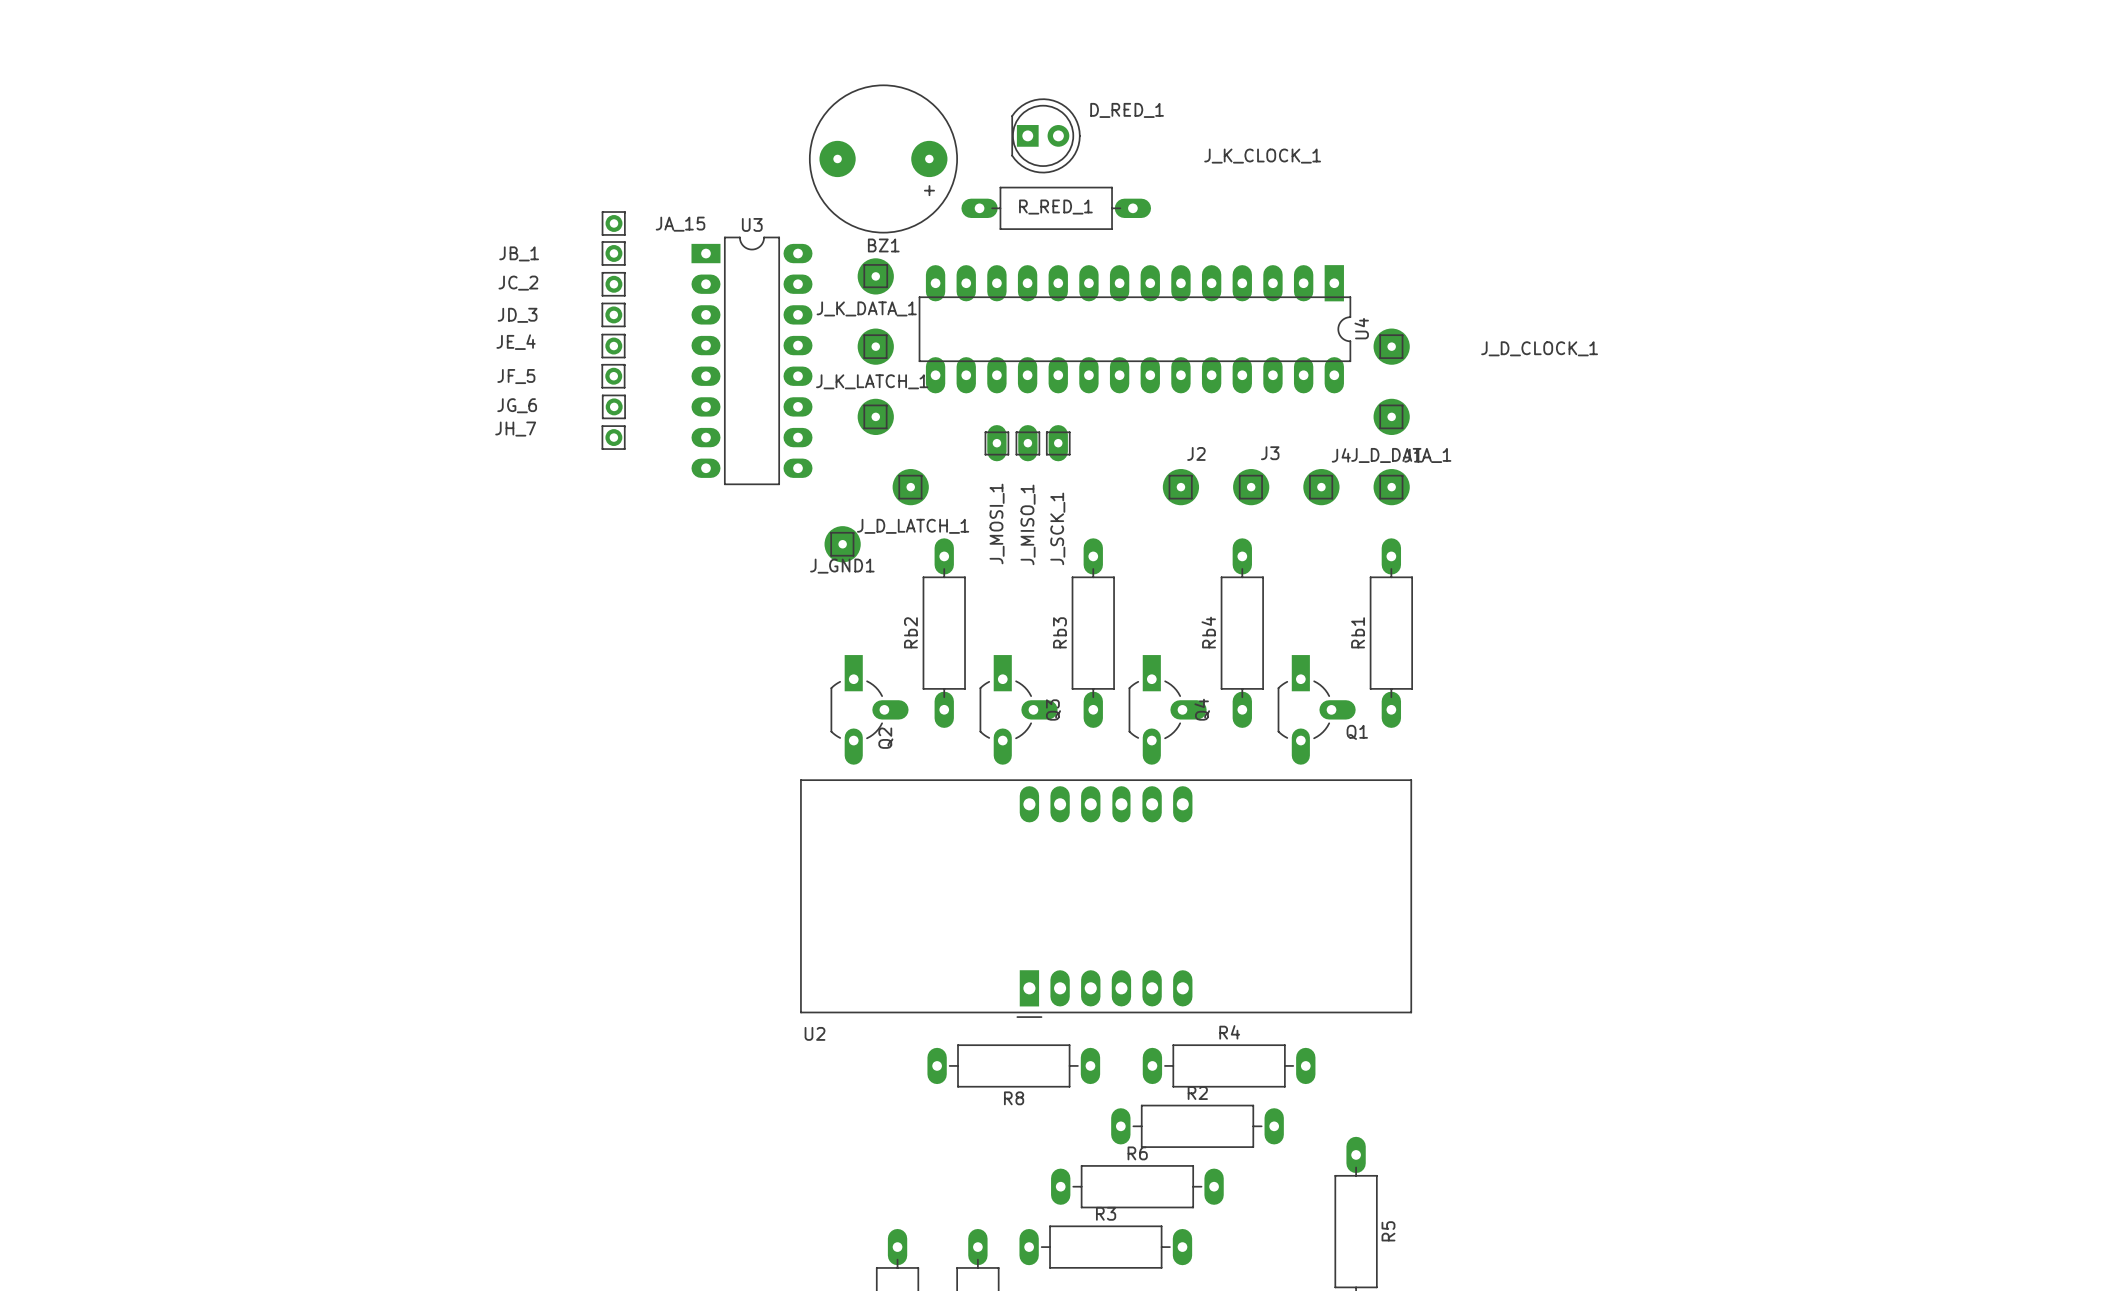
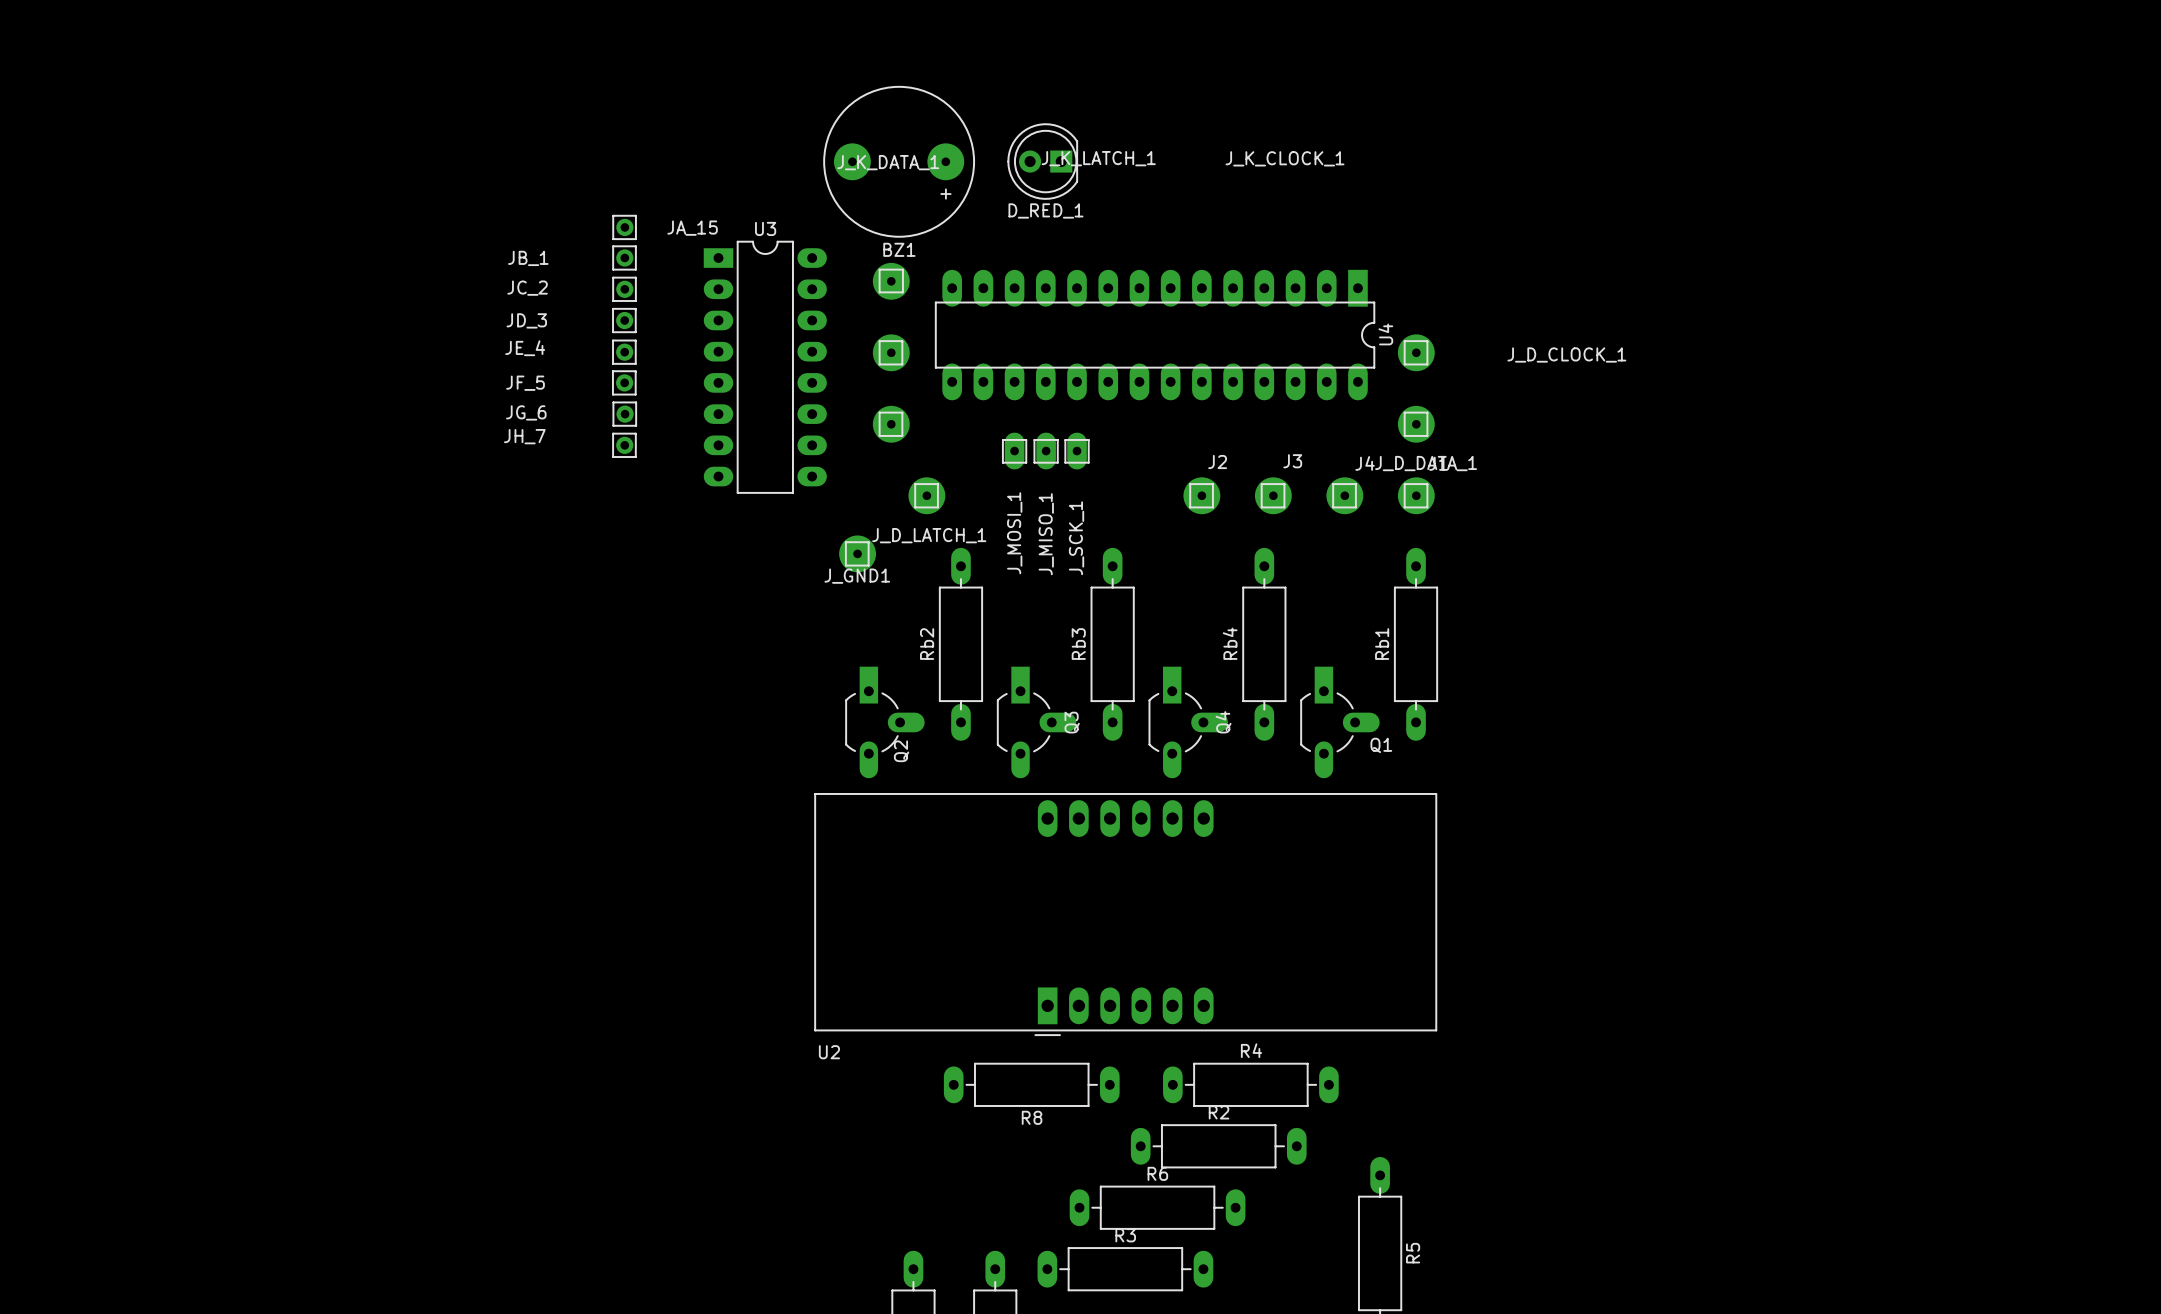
D_RED_1 footprint: [1011, 98, 1081, 174] -> [1007, 123, 1078, 200]
D_RED_1 name position: D_RED_1 (1127, 110) -> D_RED_1 (1045, 210)
R_RED_1: (1056, 208) -> none
J_K_DATA_1 name position: J_K_DATA_1 (866, 308) -> J_K_DATA_1 (888, 162)
J_K_LATCH_1 name position: J_K_LATCH_1 (872, 381) -> J_K_LATCH_1 (1098, 158)

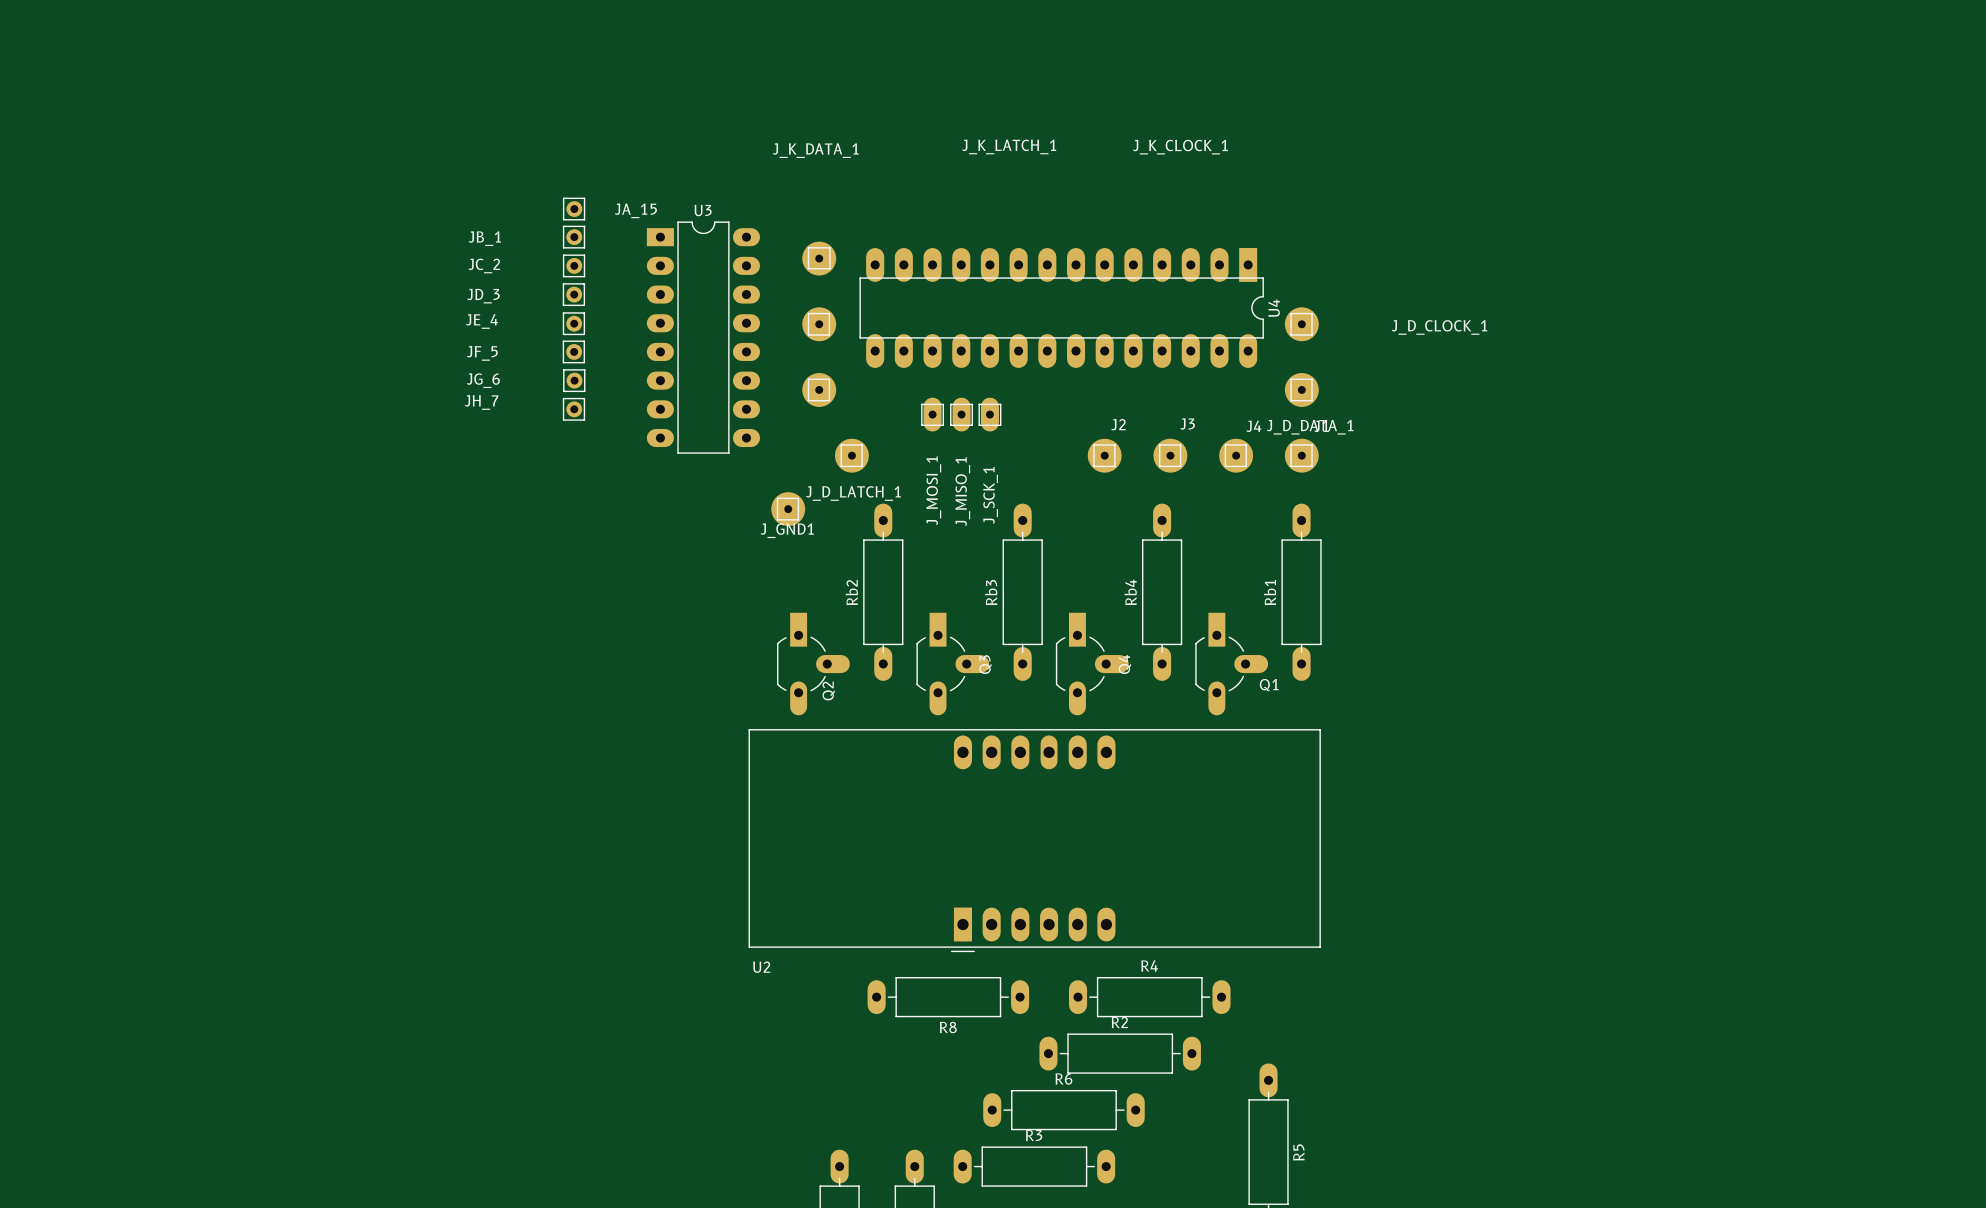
BZ1: (899, 161) -> none
D_RED_1: (1042, 161) -> none

